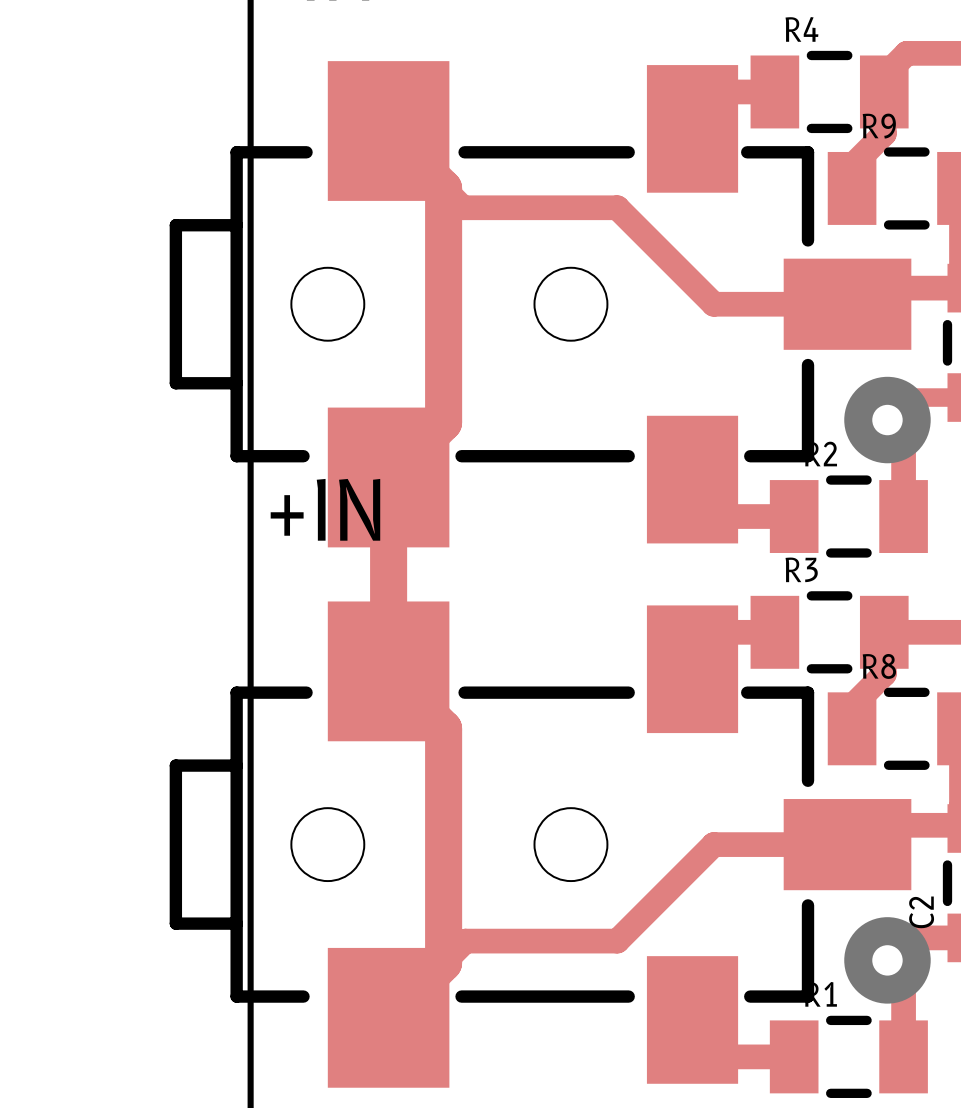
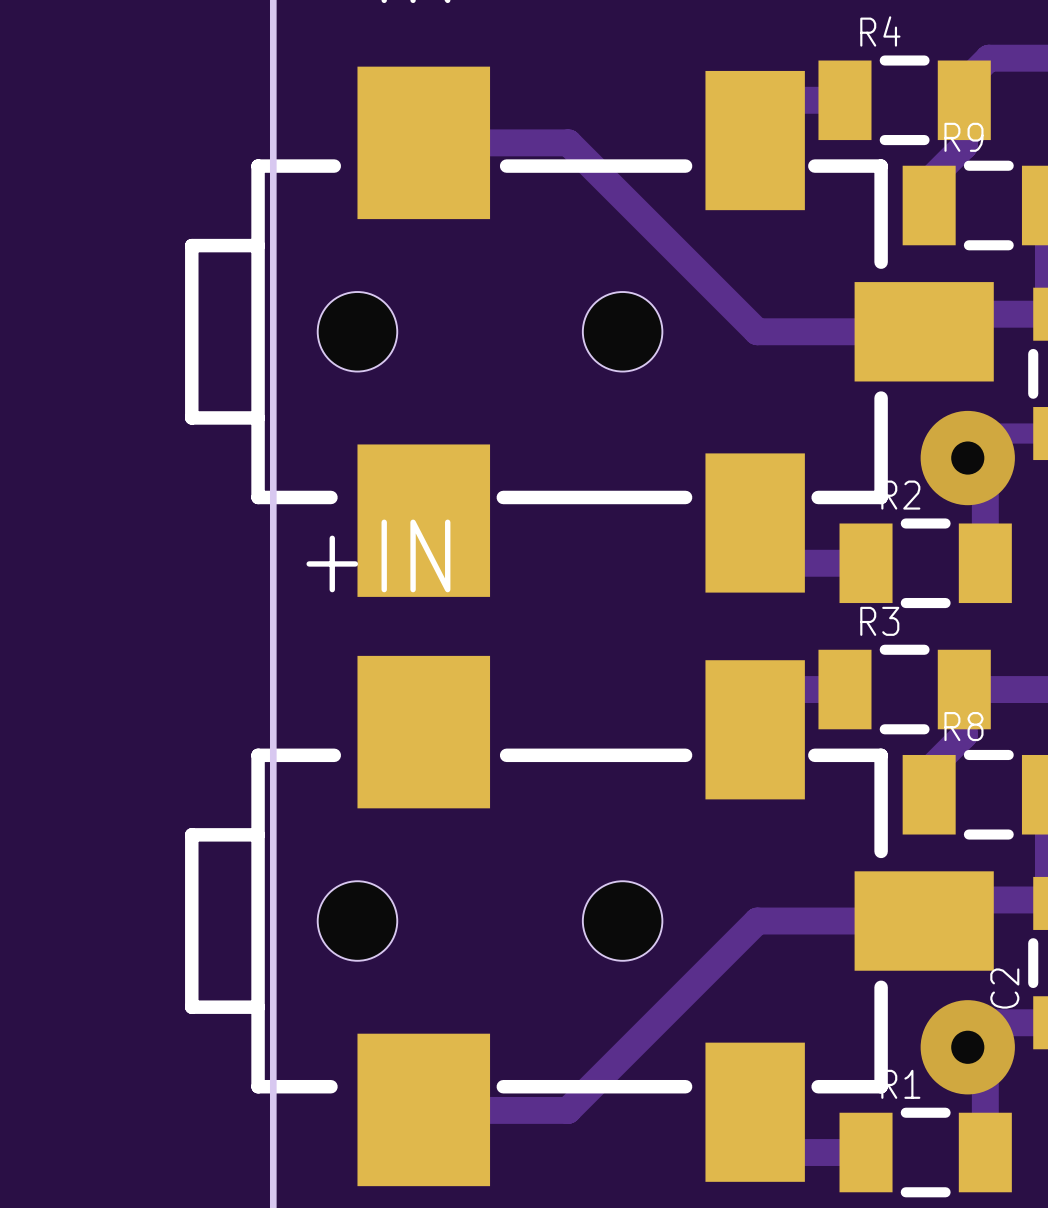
track: (443, 188) (462, 207) (617, 207) (713, 304) -> (423, 142) (568, 142) (757, 331) (778, 331)
track: (443, 188) (443, 422) (388, 477) (388, 673) (443, 728) (443, 962) -> none
track: (713, 844) (617, 941) (465, 941) (443, 962) -> (778, 921) (757, 921) (567, 1110) (424, 1110)

